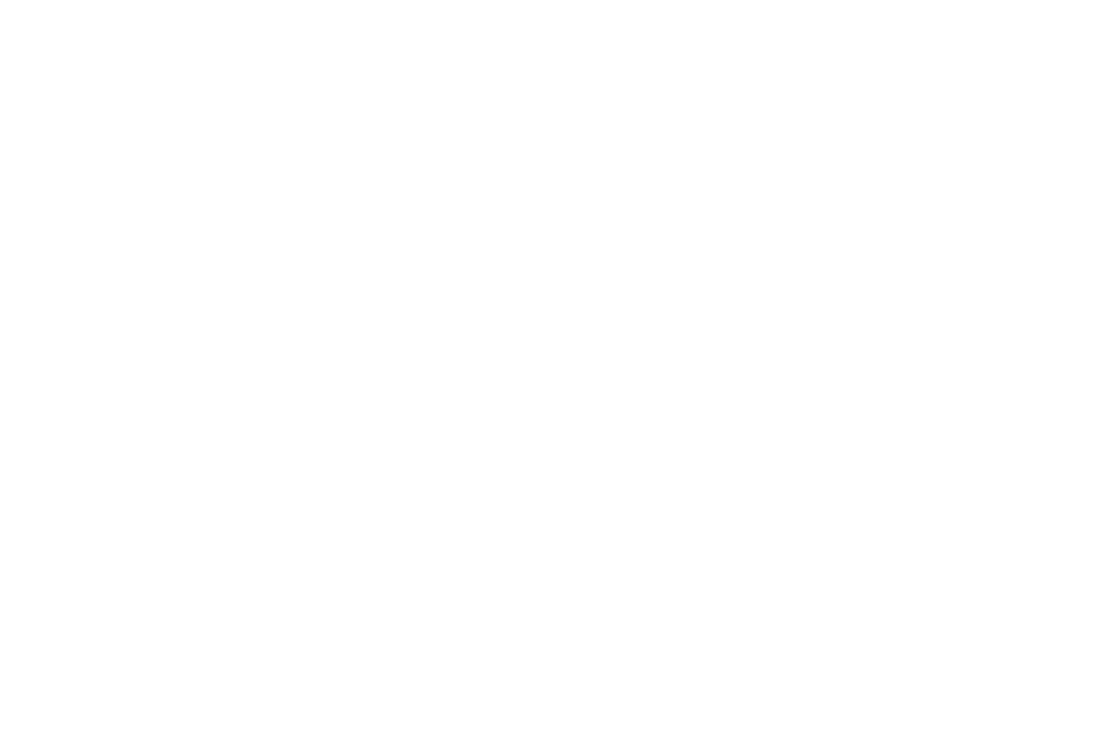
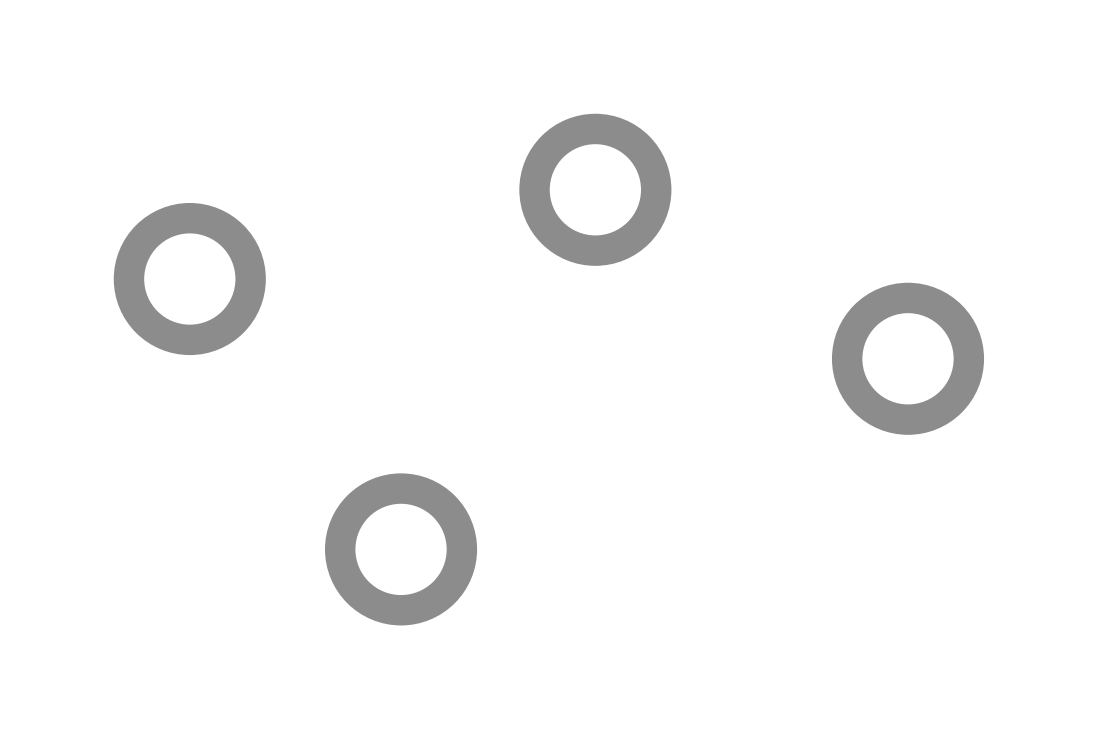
part: none -> (595, 189)
part: none -> (189, 279)
part: none -> (908, 358)
part: none -> (401, 549)

